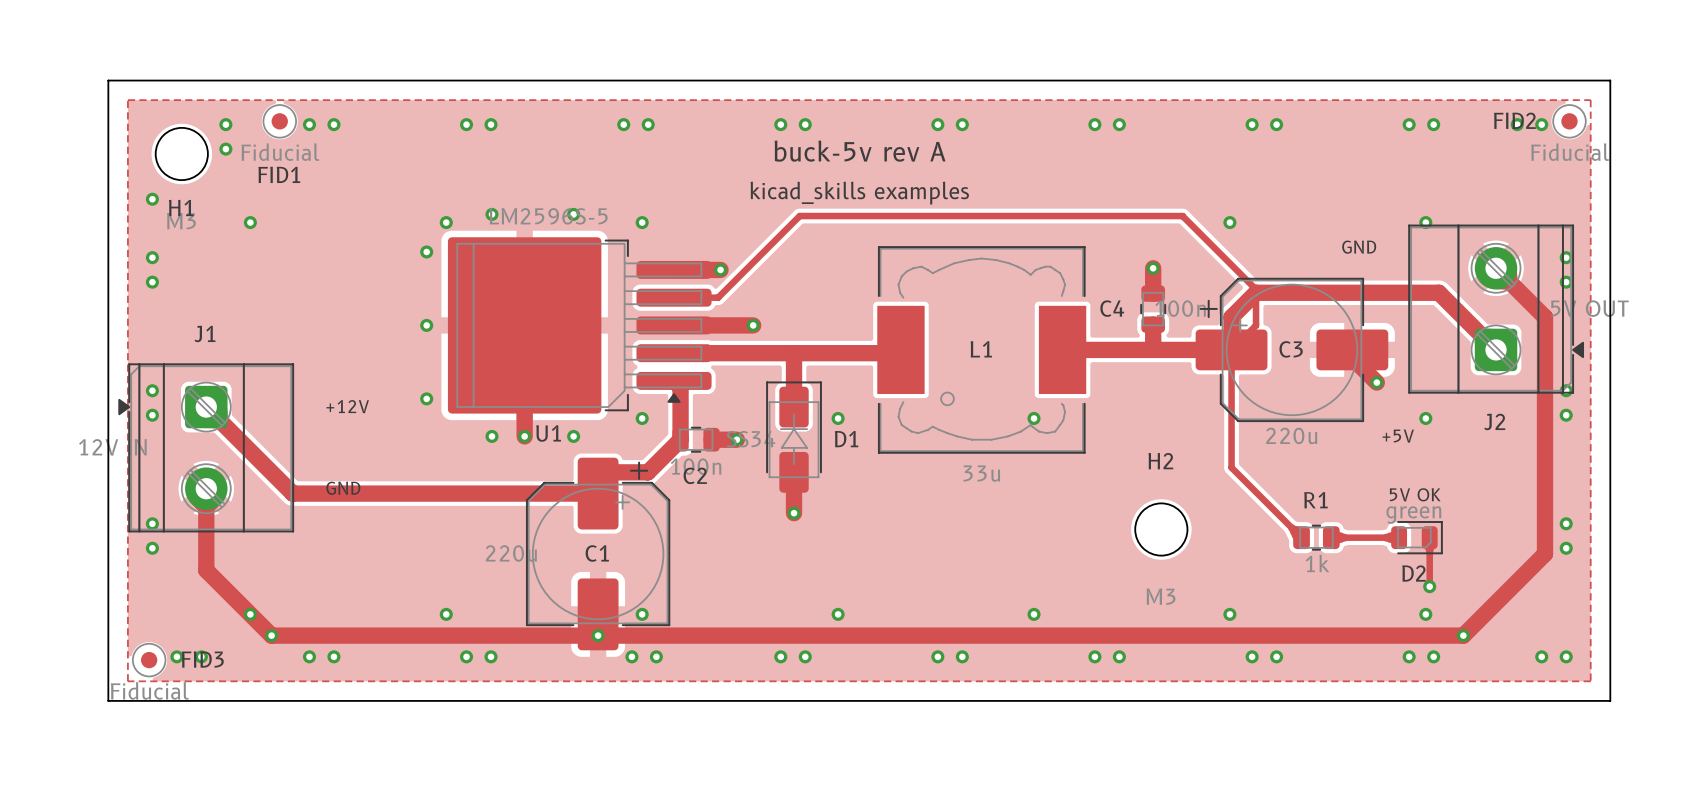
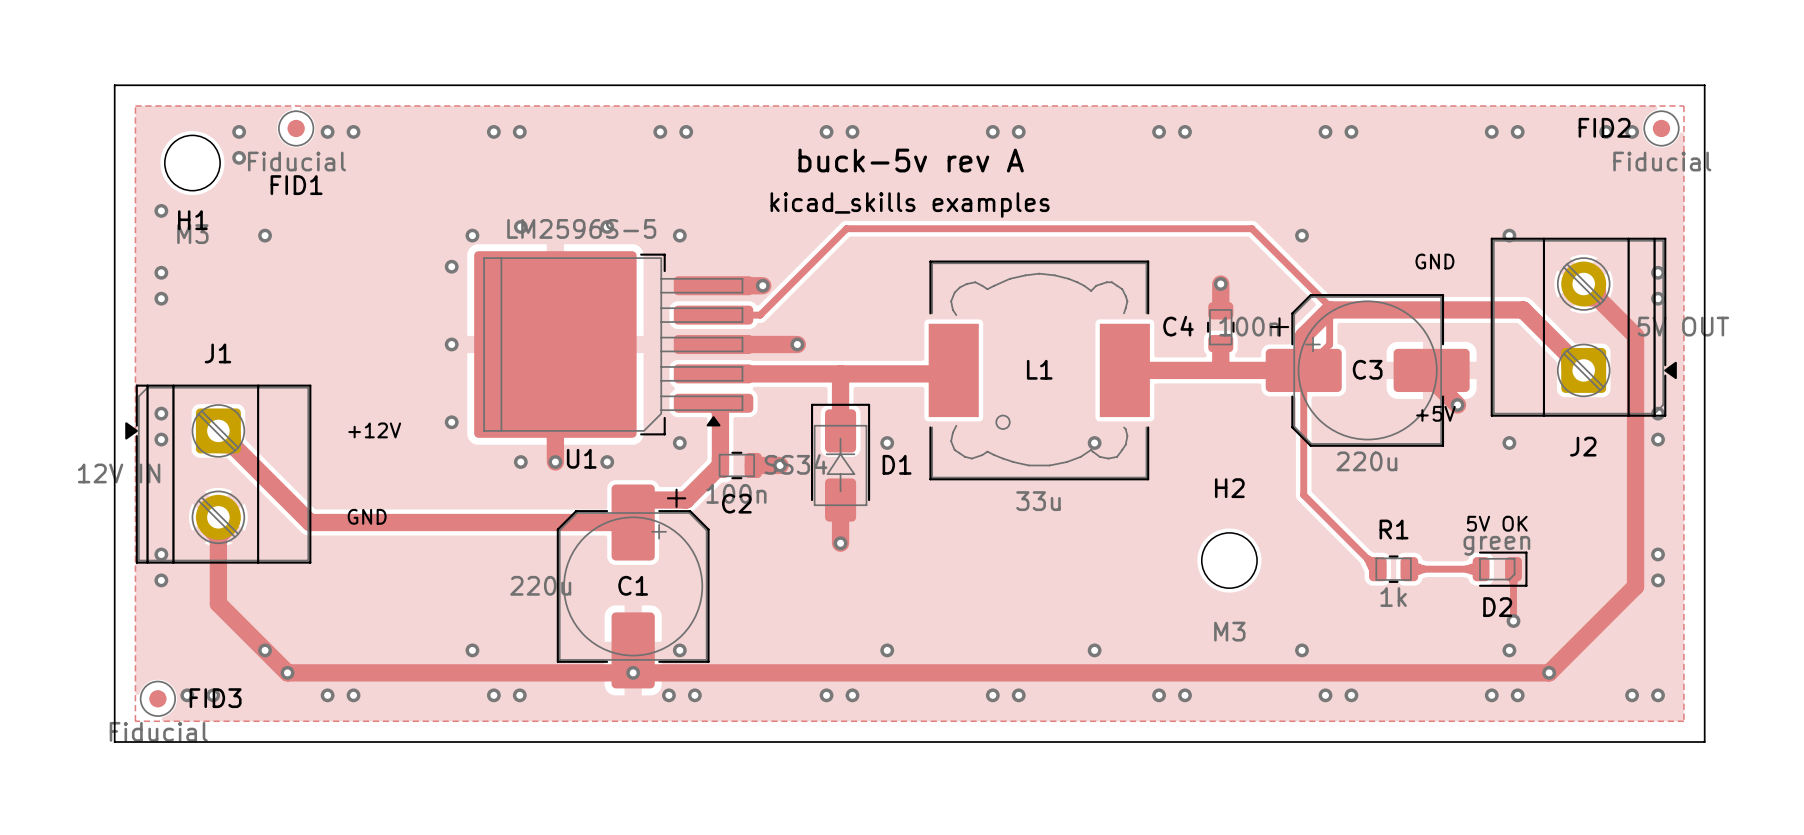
text position: +5V (1398, 436) -> +5V (1435, 413)

